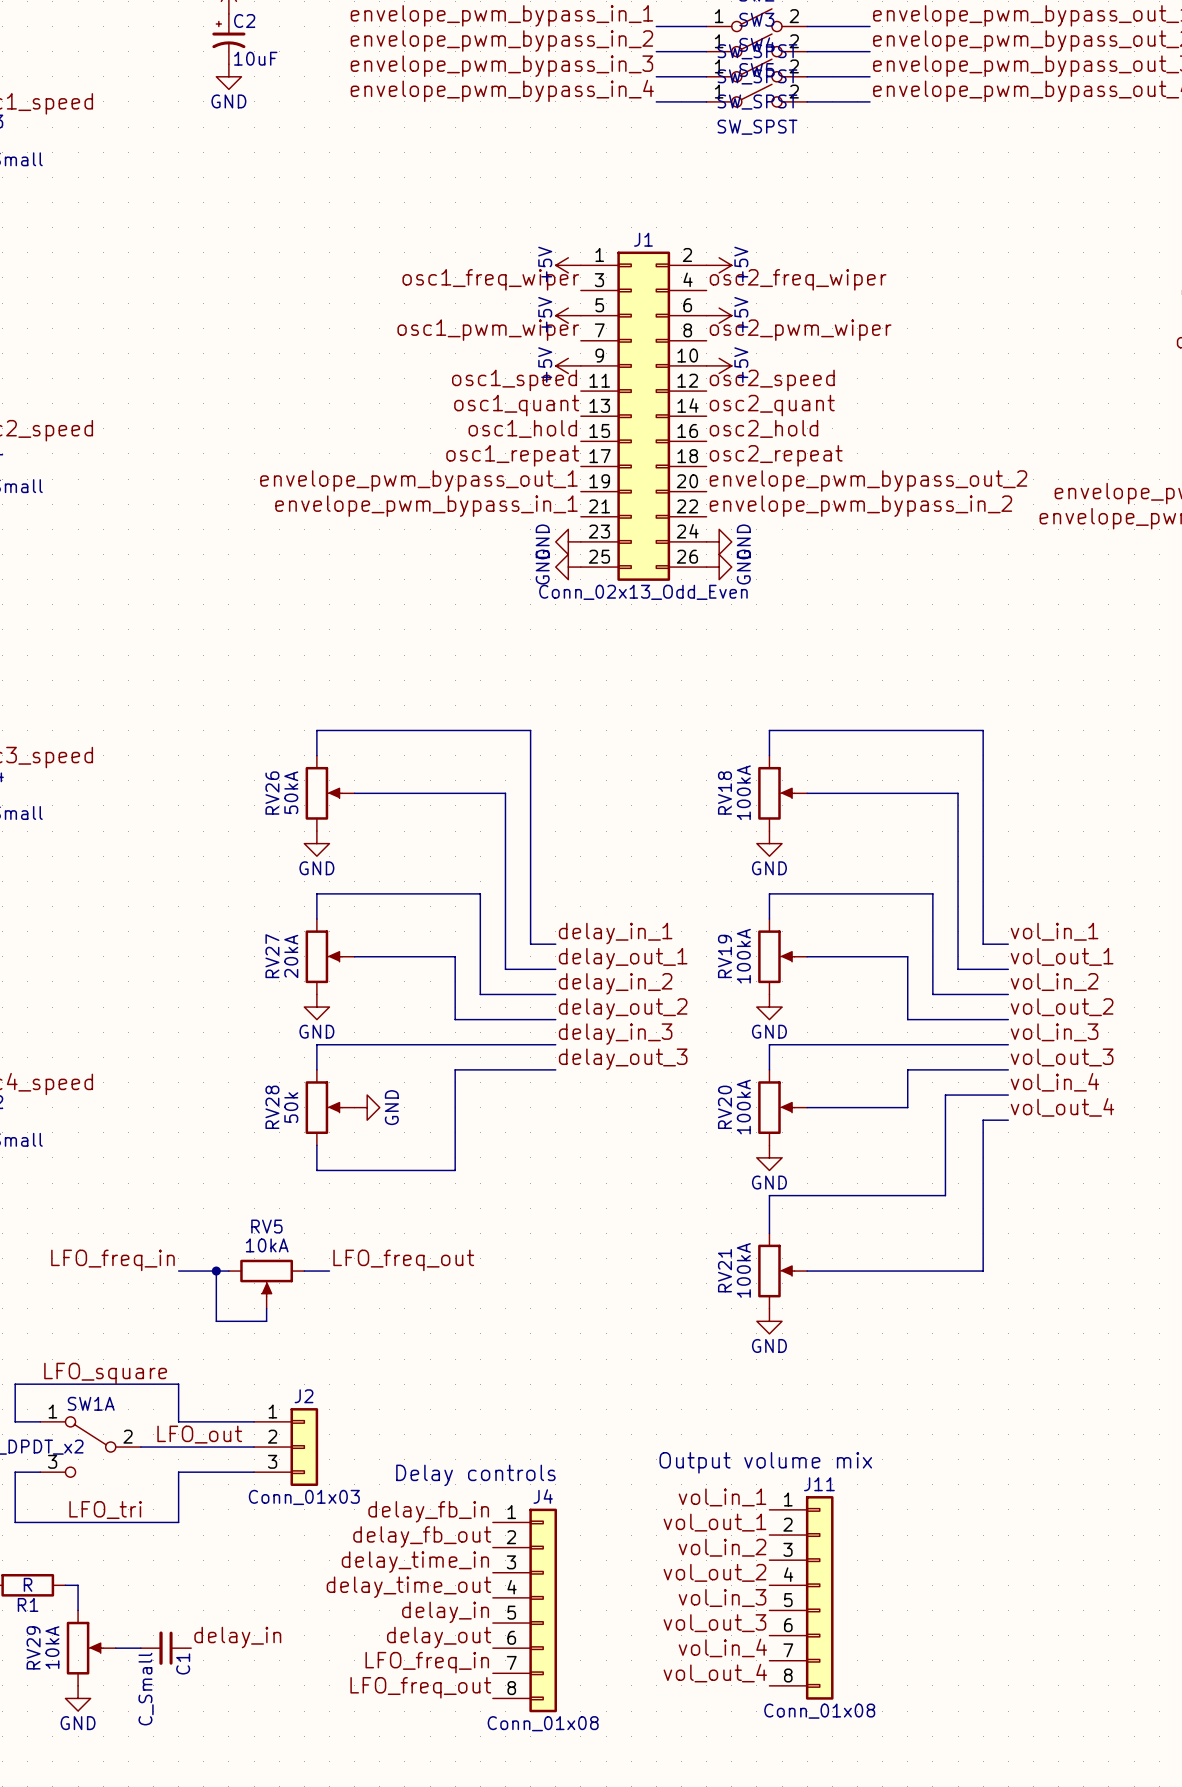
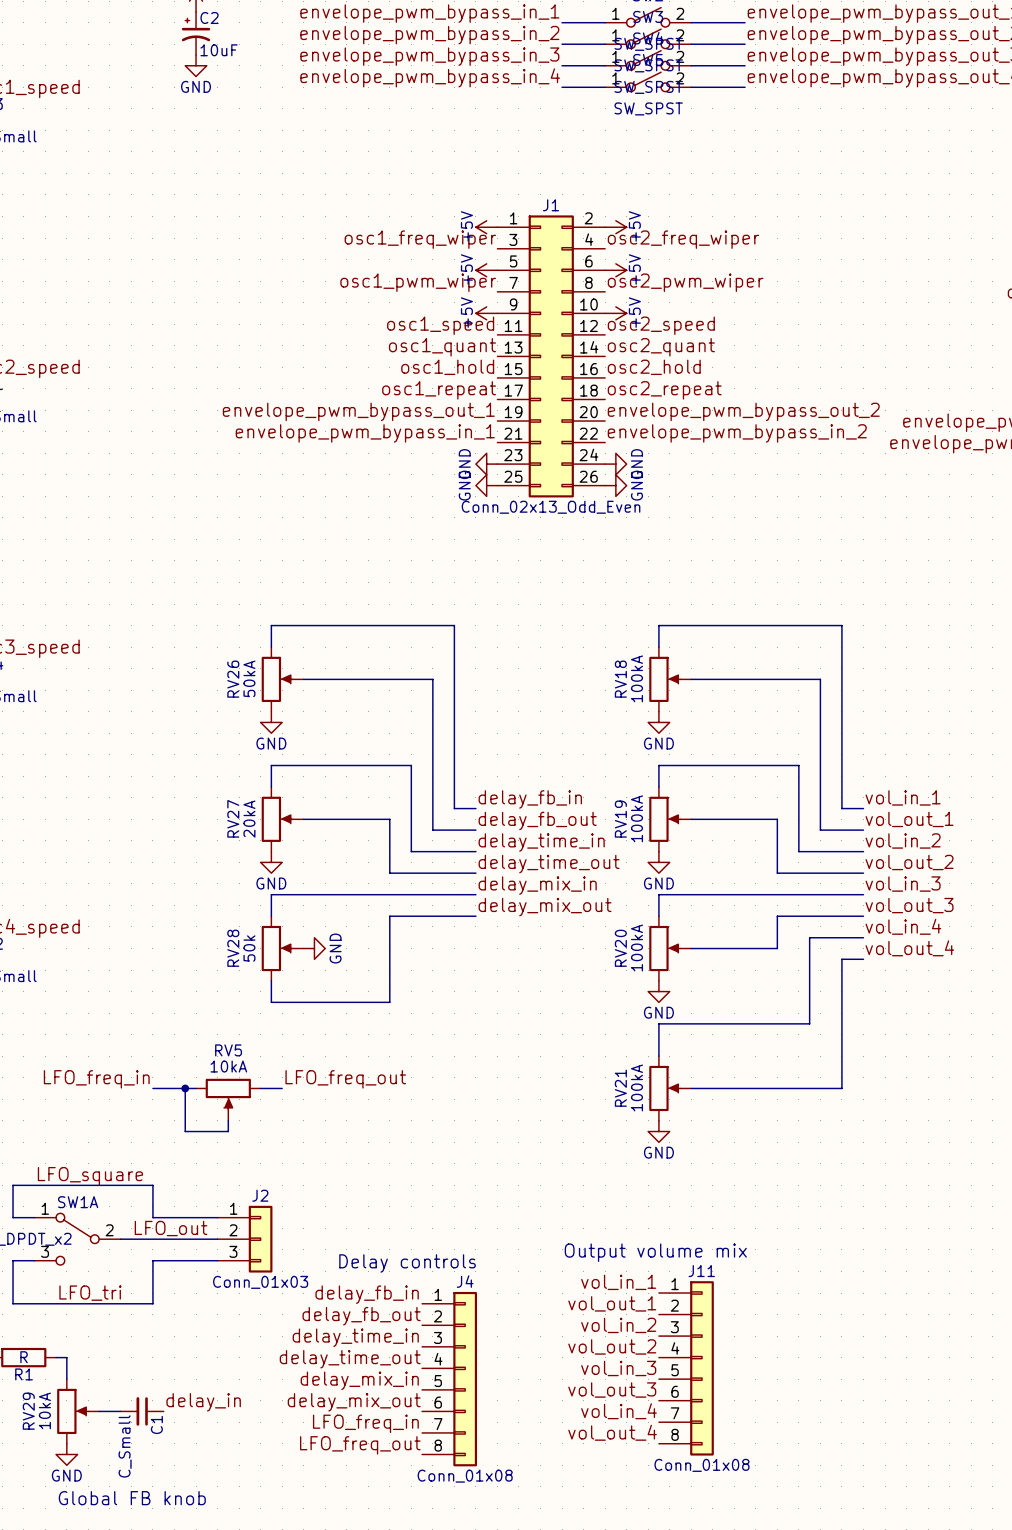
label: delay_in_1 (615, 933) -> delay_fb_in (530, 799)
label: delay_out_1 (623, 958) -> delay_fb_out (537, 820)
label: delay_in_2 (615, 983) -> delay_time_in (541, 842)
label: delay_out_2 (623, 1008) -> delay_time_out (549, 864)
label: delay_in_3 (615, 1034) -> delay_mix_in (537, 885)
label: delay_out_3 (623, 1059) -> delay_mix_out (545, 907)
label: delay_in (445, 1612) -> delay_mix_in (359, 1380)
label: delay_out (439, 1637) -> delay_mix_out (354, 1402)
text: none -> Global FB knob (132, 1498)

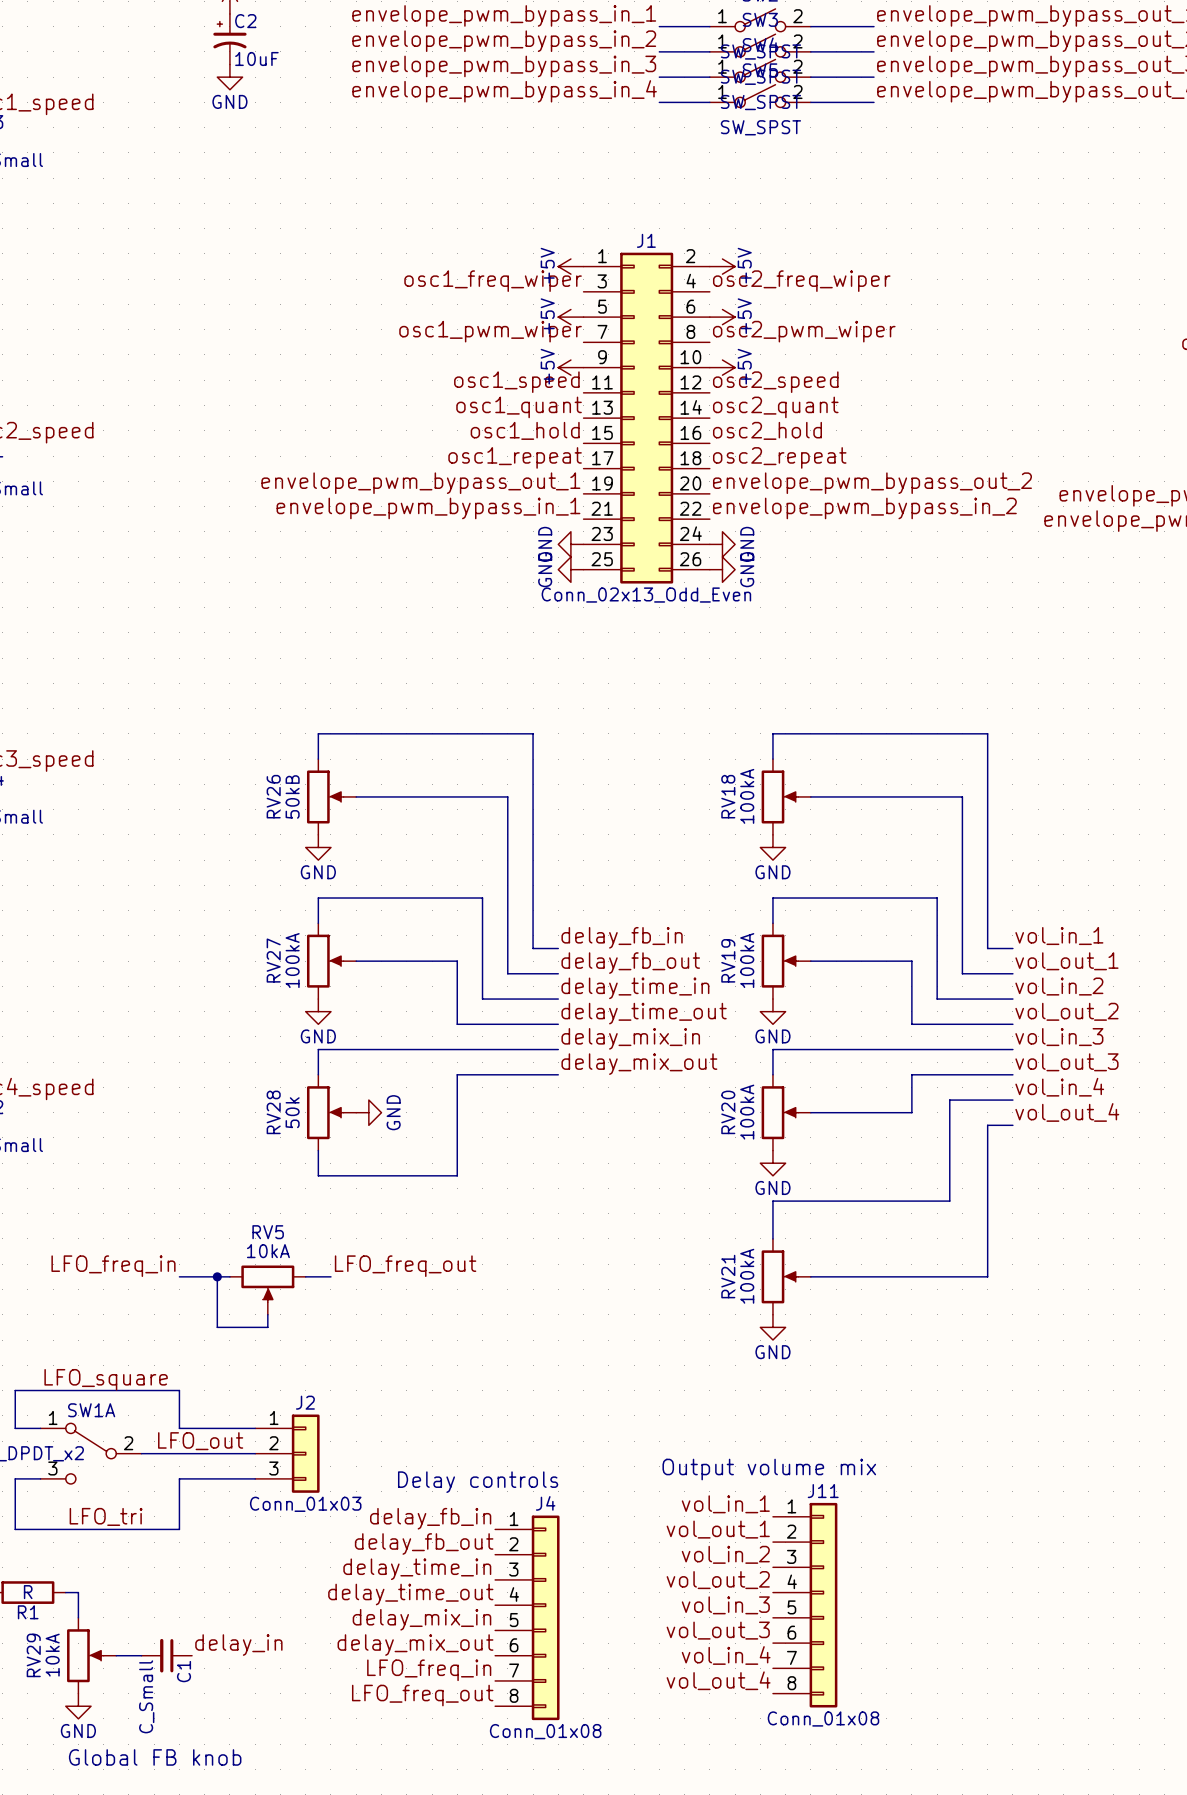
RV26 value: 50kA (249, 678) -> 50kB (292, 796)
RV27 value: 20kA (249, 819) -> 100kA (292, 960)

